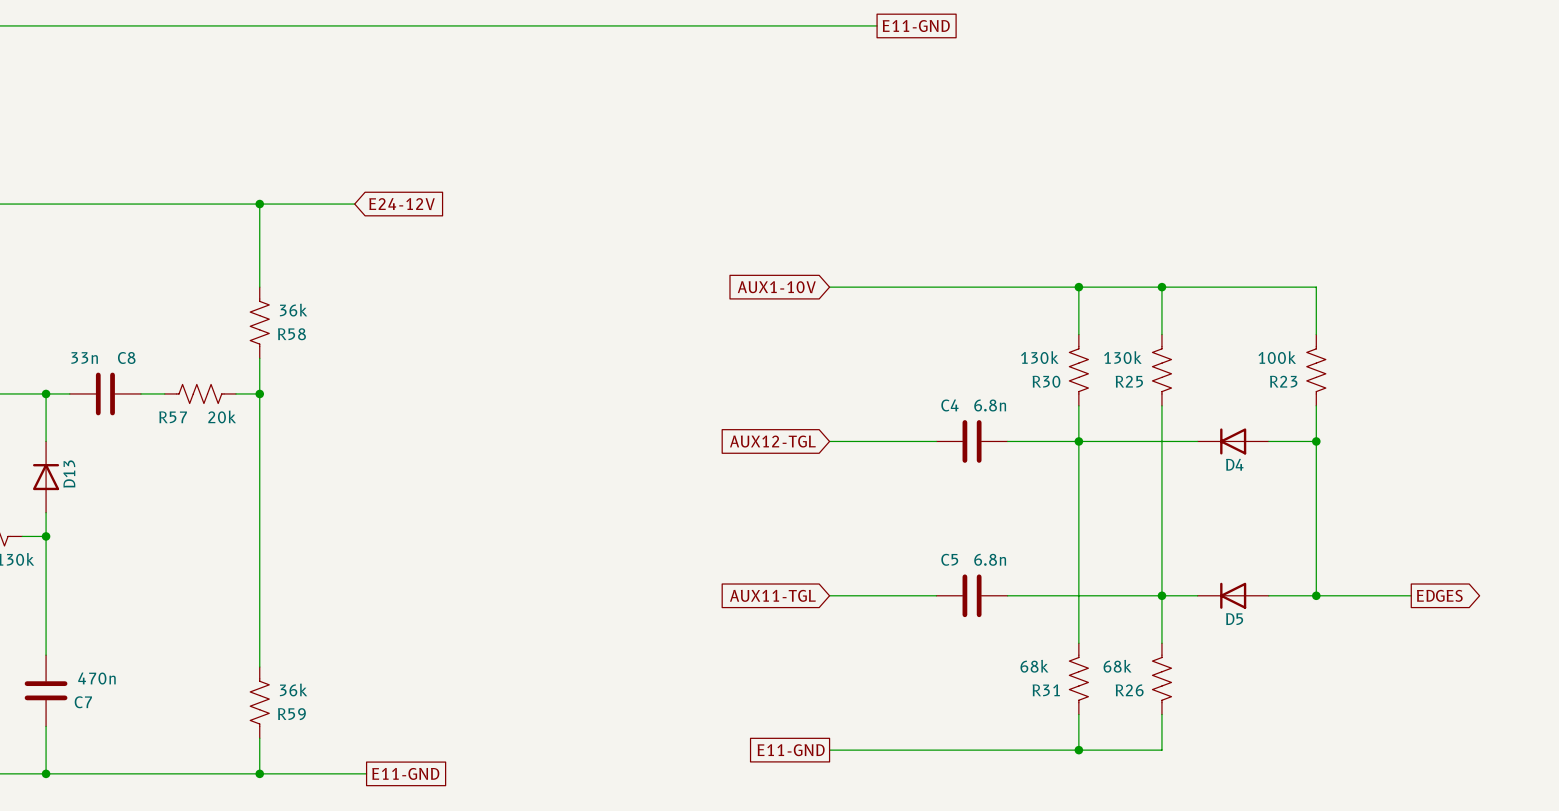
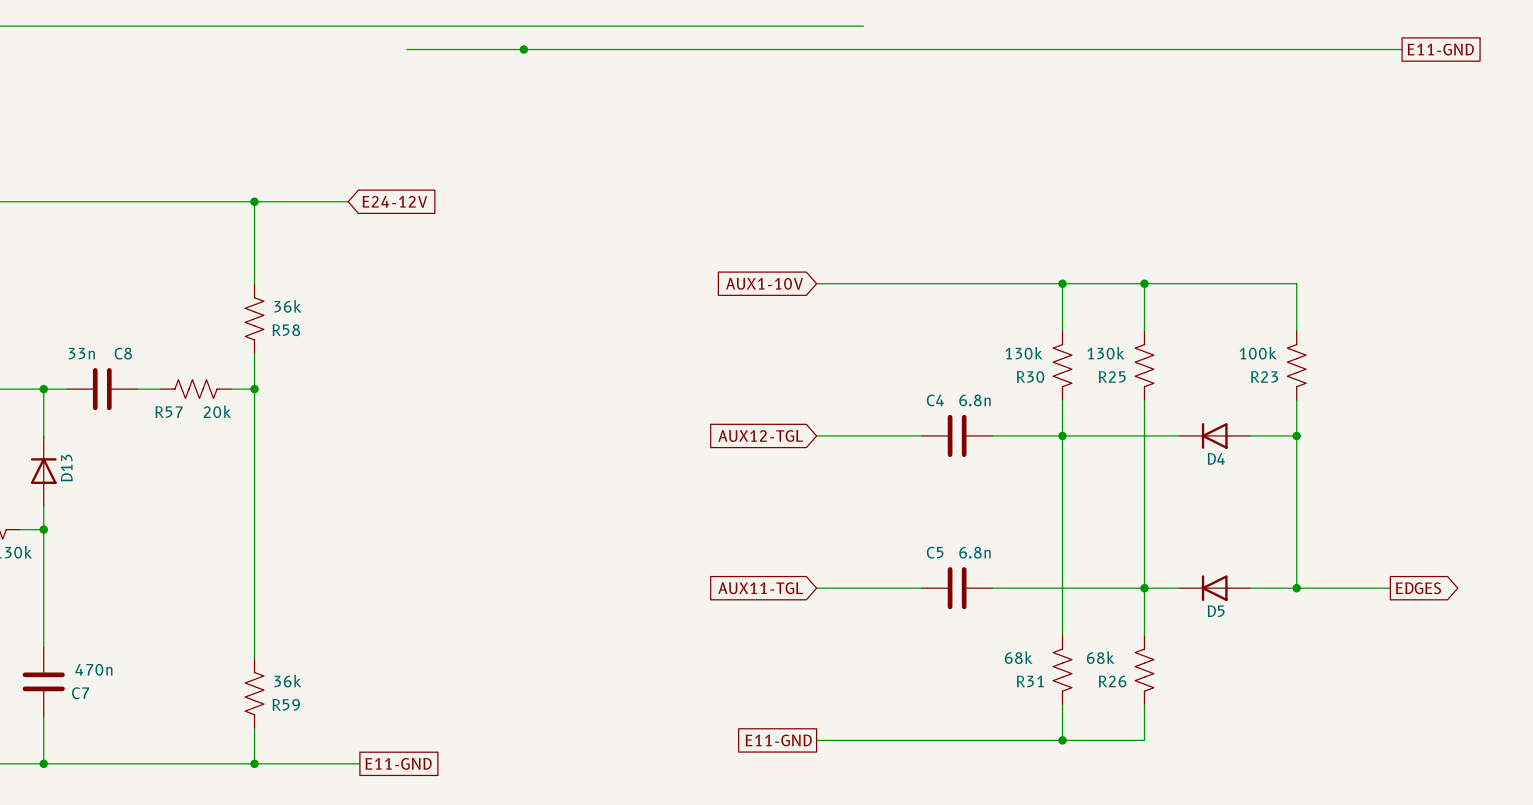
global label: E11-GND (916, 26) -> none
wire: none -> (406, 49) (1402, 49)
junction: none -> (523, 49)
global label: none -> E11-GND (1440, 49)

